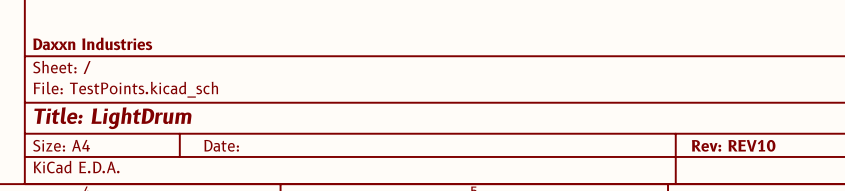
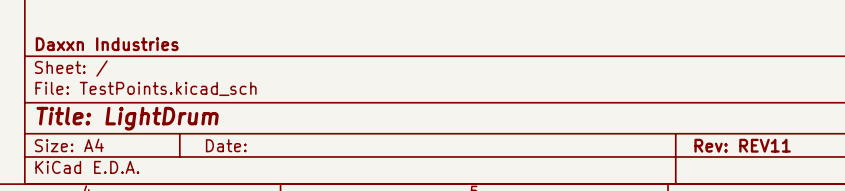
title block: Rev: REV10 (733, 145) -> Rev: REV11 (742, 145)

